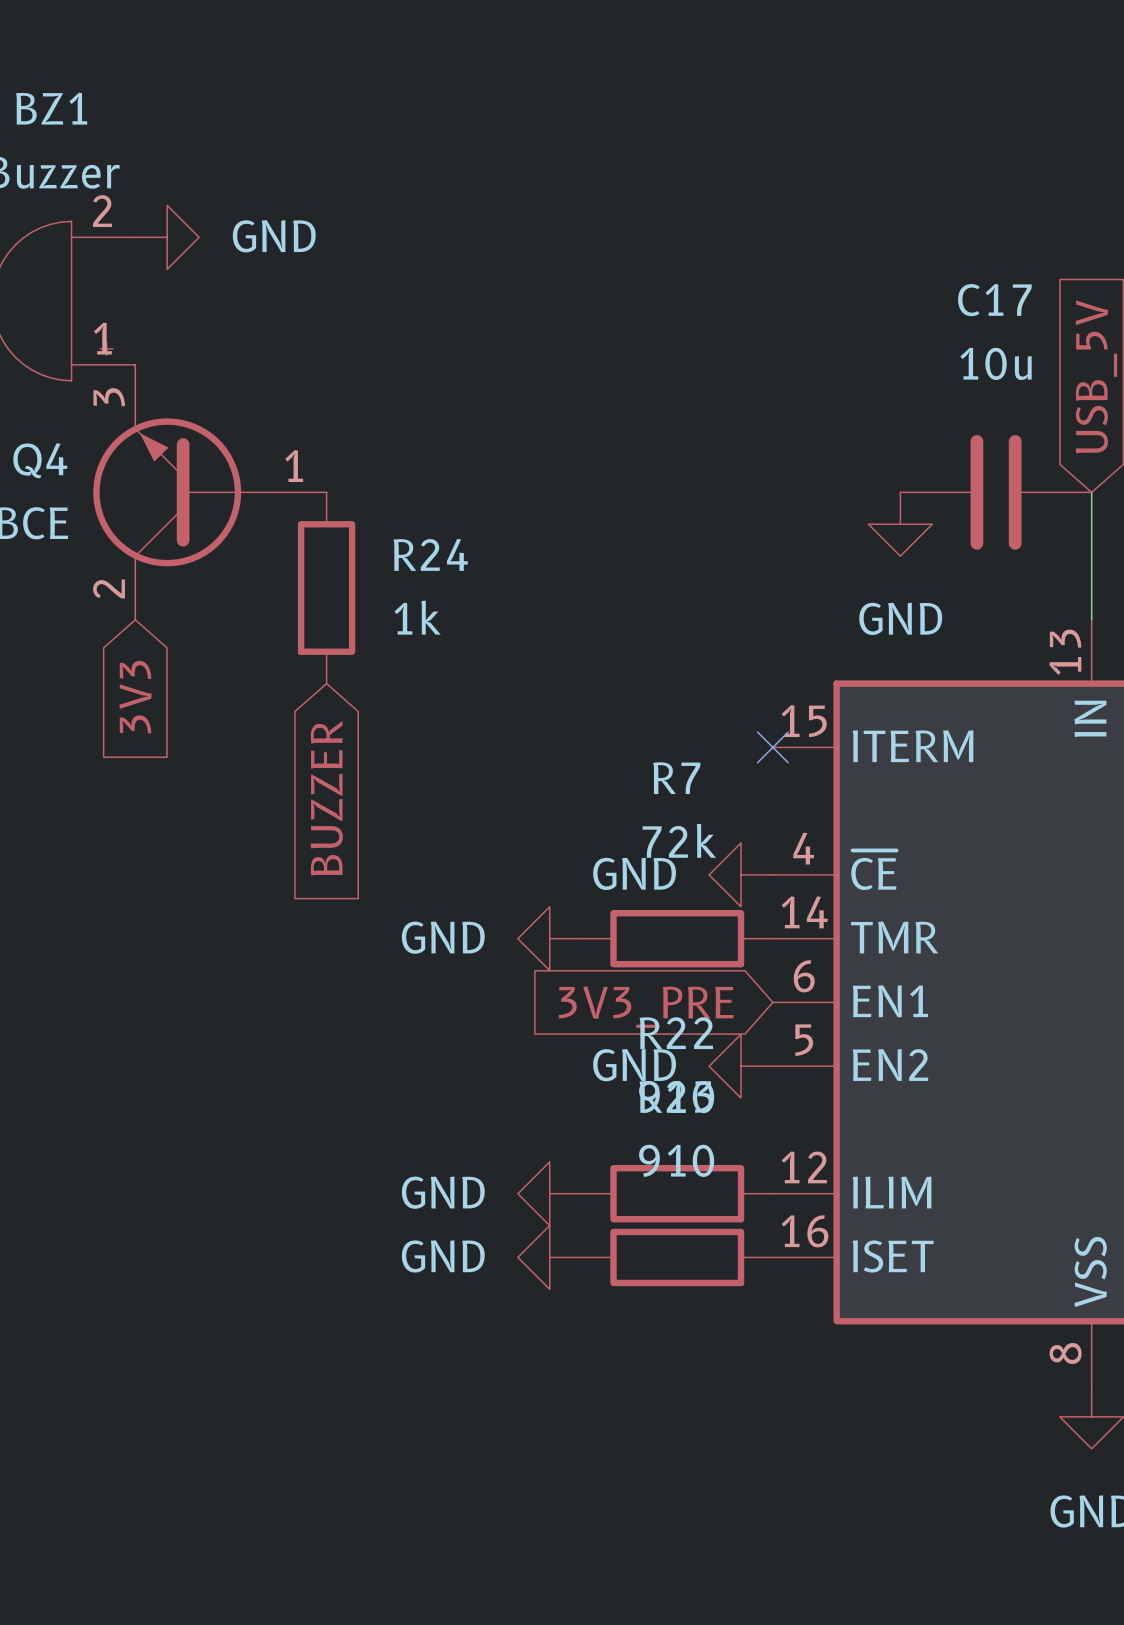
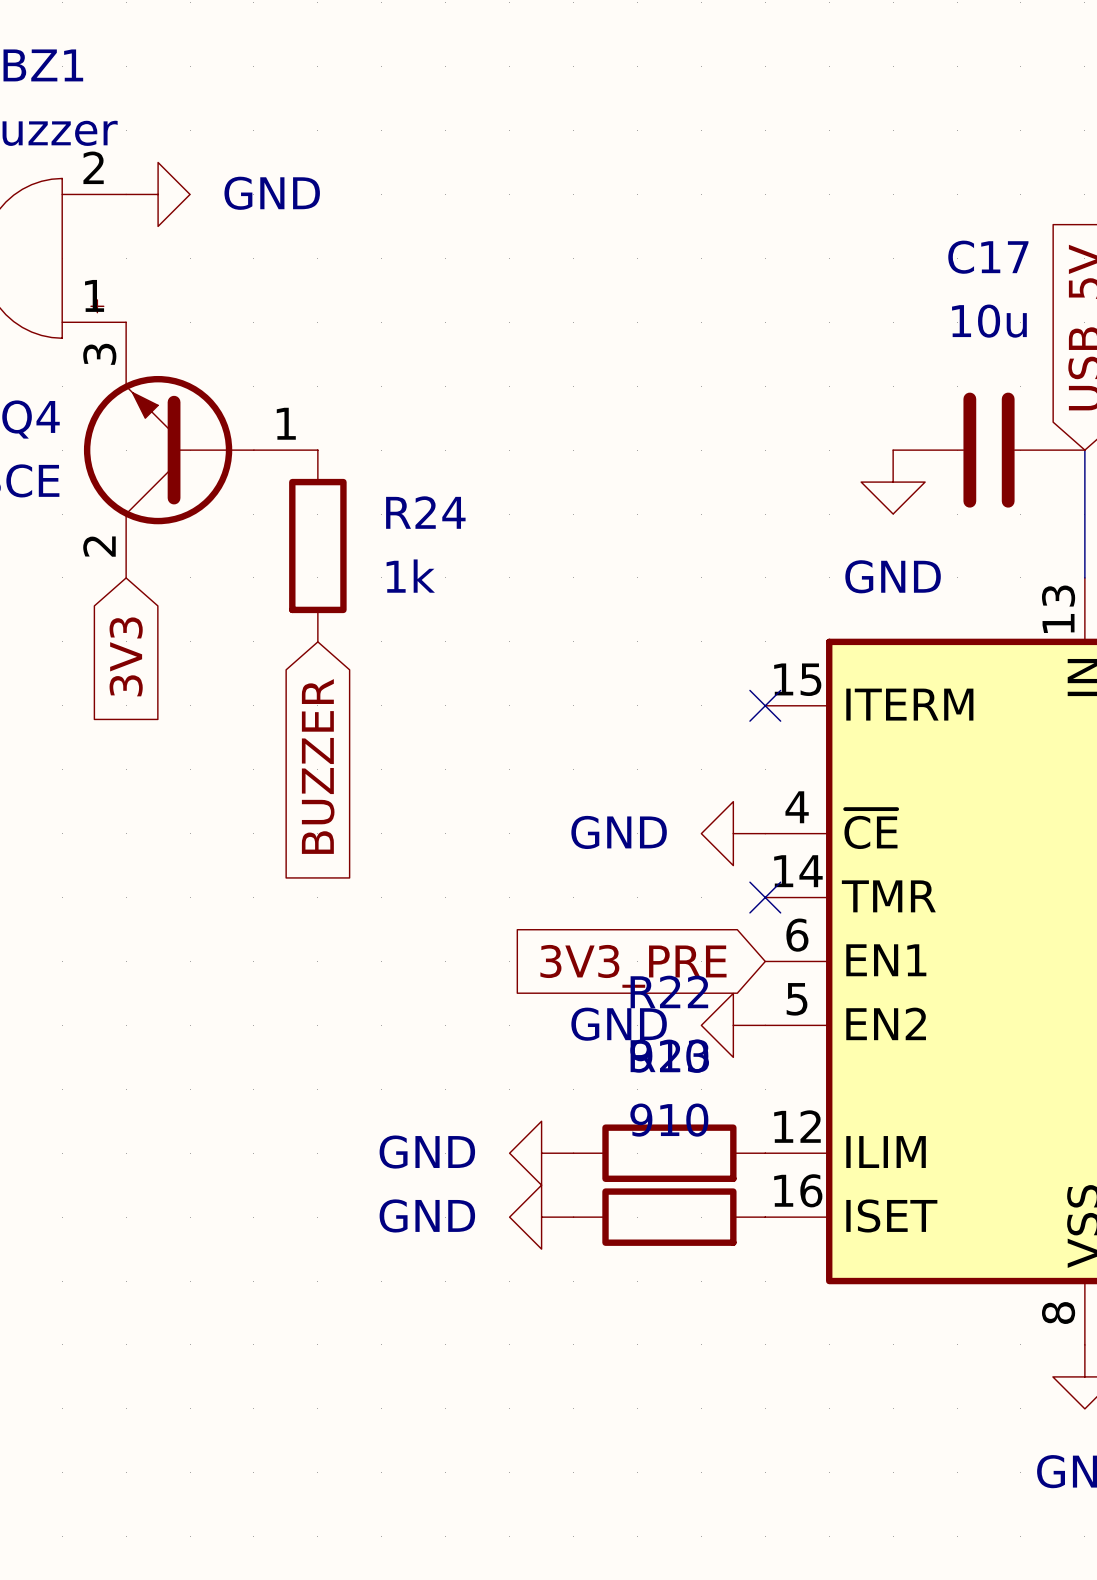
power symbol: GND (549, 938) -> none
R7: 72k (677, 938) -> none
no-connect mark: none -> (765, 897)

